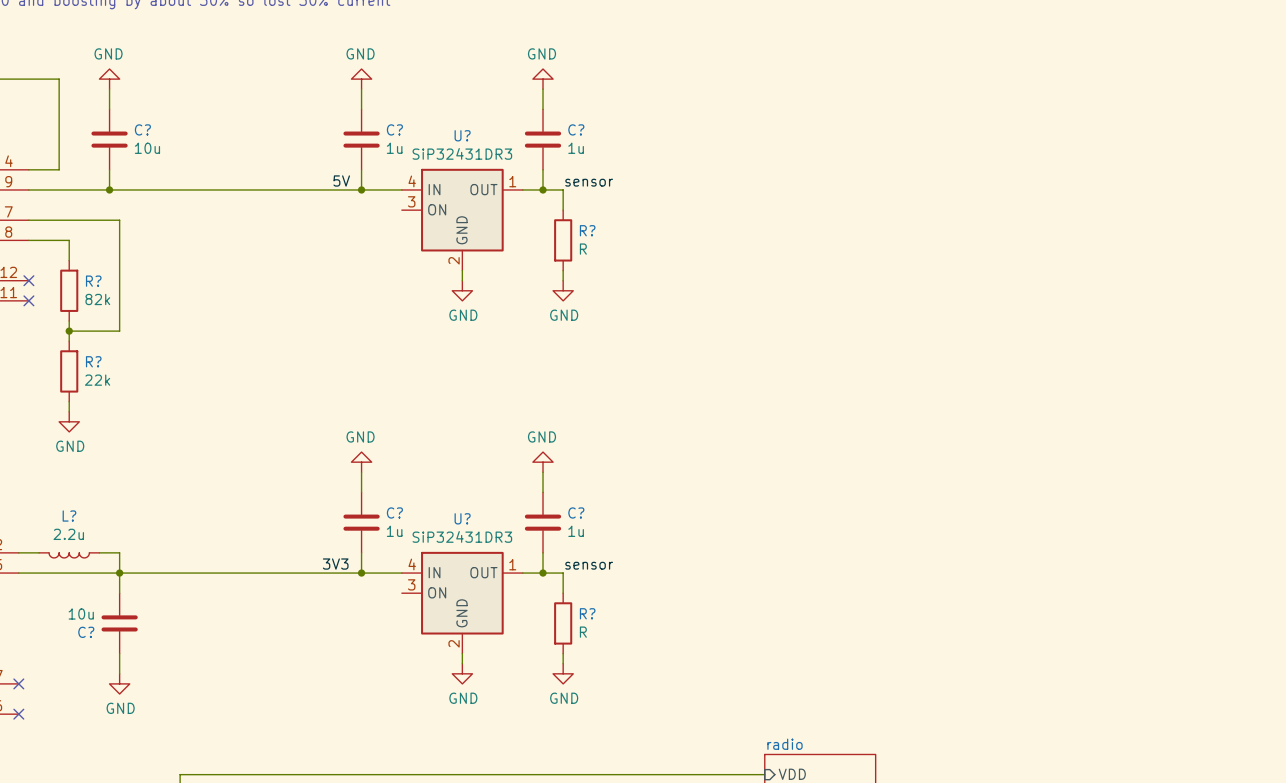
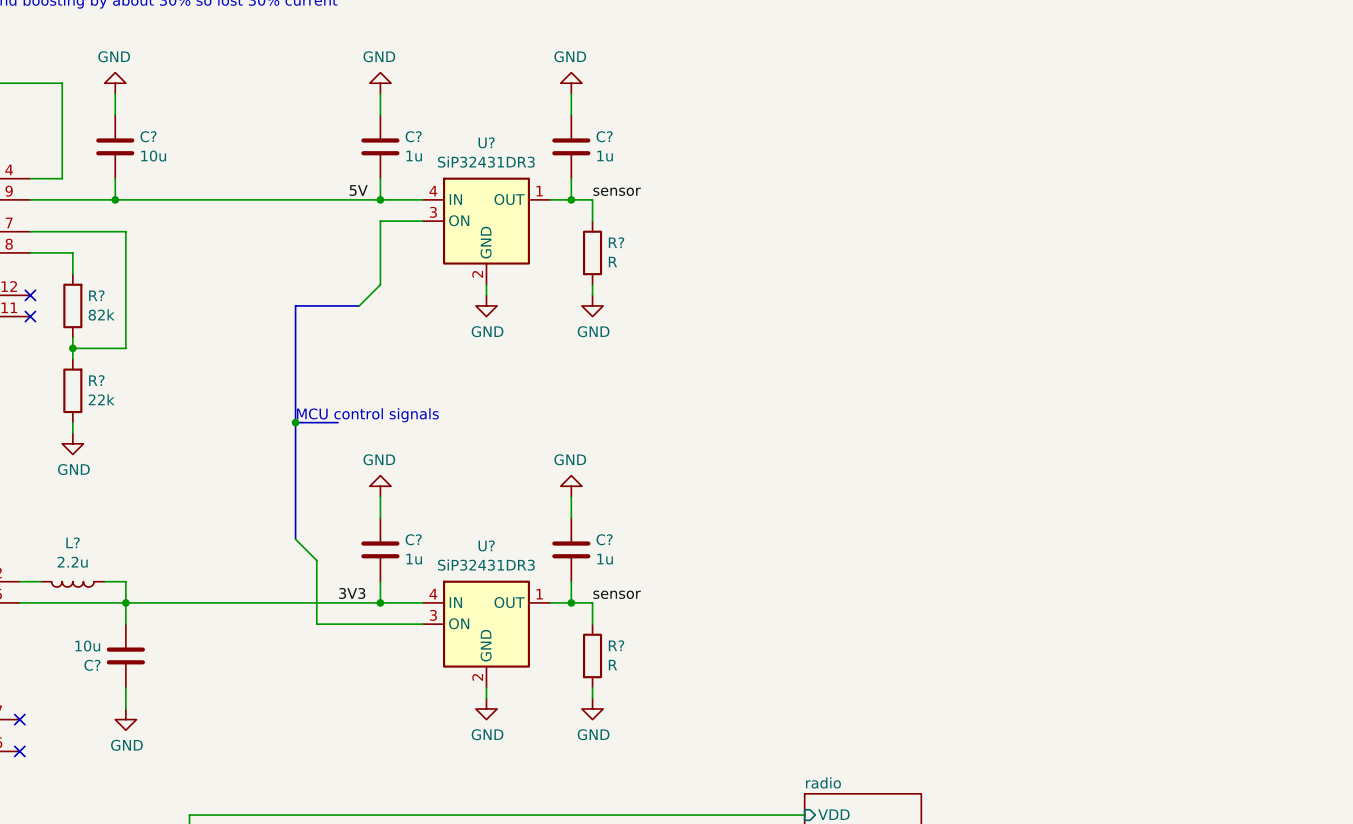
wire: none -> (422, 221) (380, 221) (380, 284) (359, 305)
bus: none -> (359, 305) (295, 305) (295, 539)
text: none -> MCU control signals (367, 415)
bus: none -> (295, 422) (337, 422)
junction: none -> (295, 422)
wire: none -> (295, 539) (316, 560) (316, 624) (422, 624)

